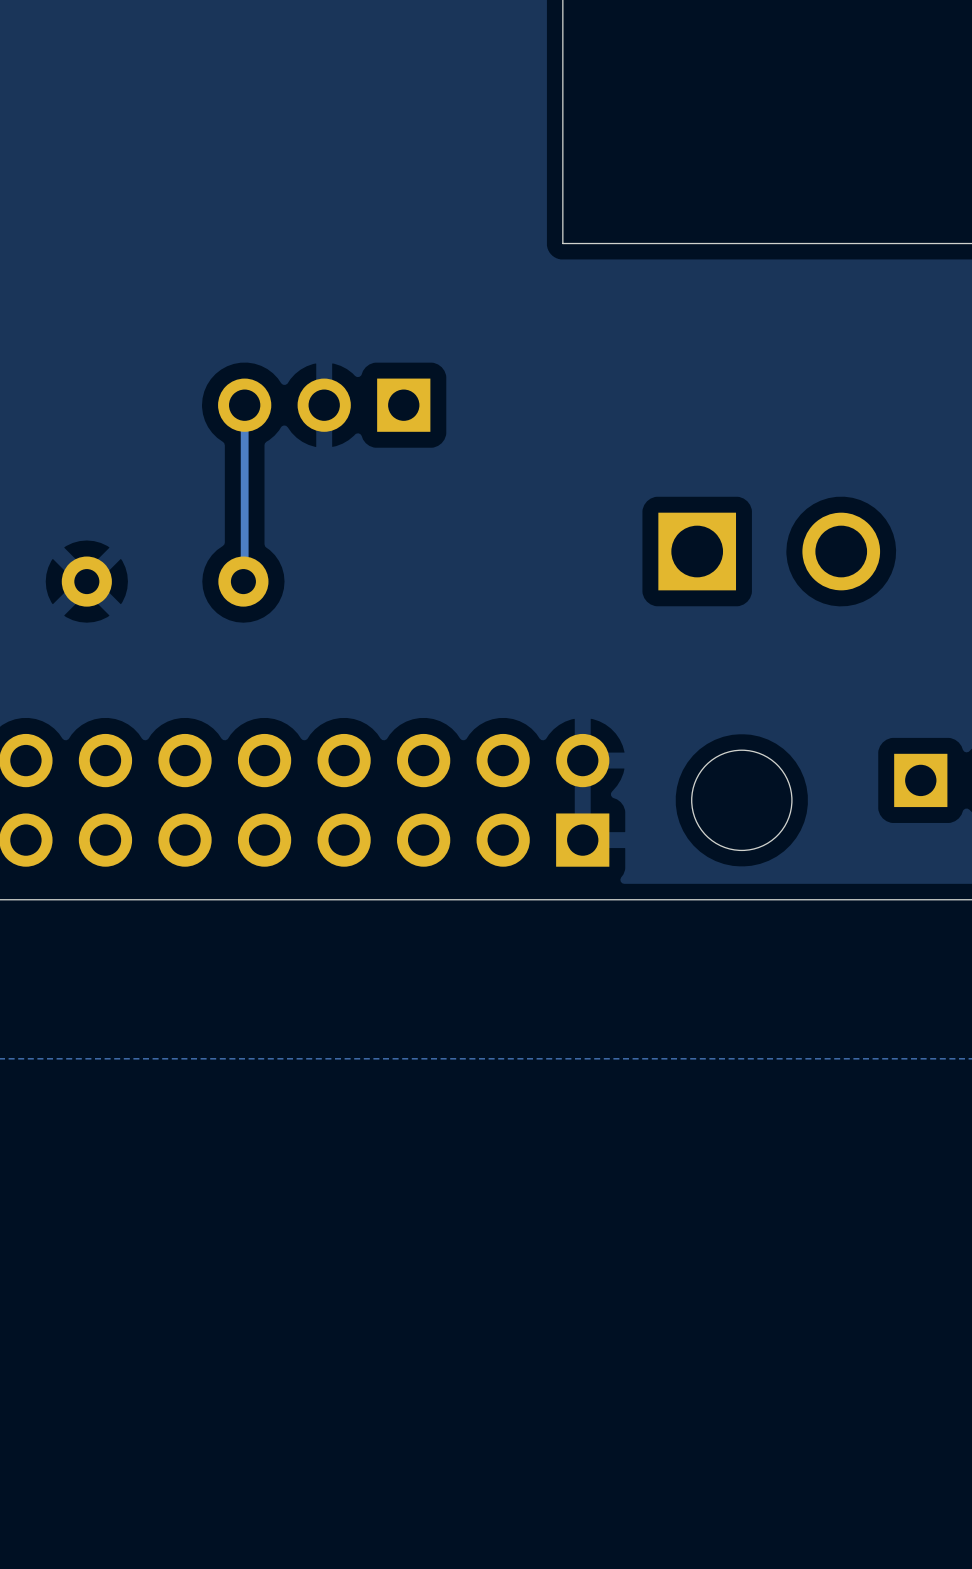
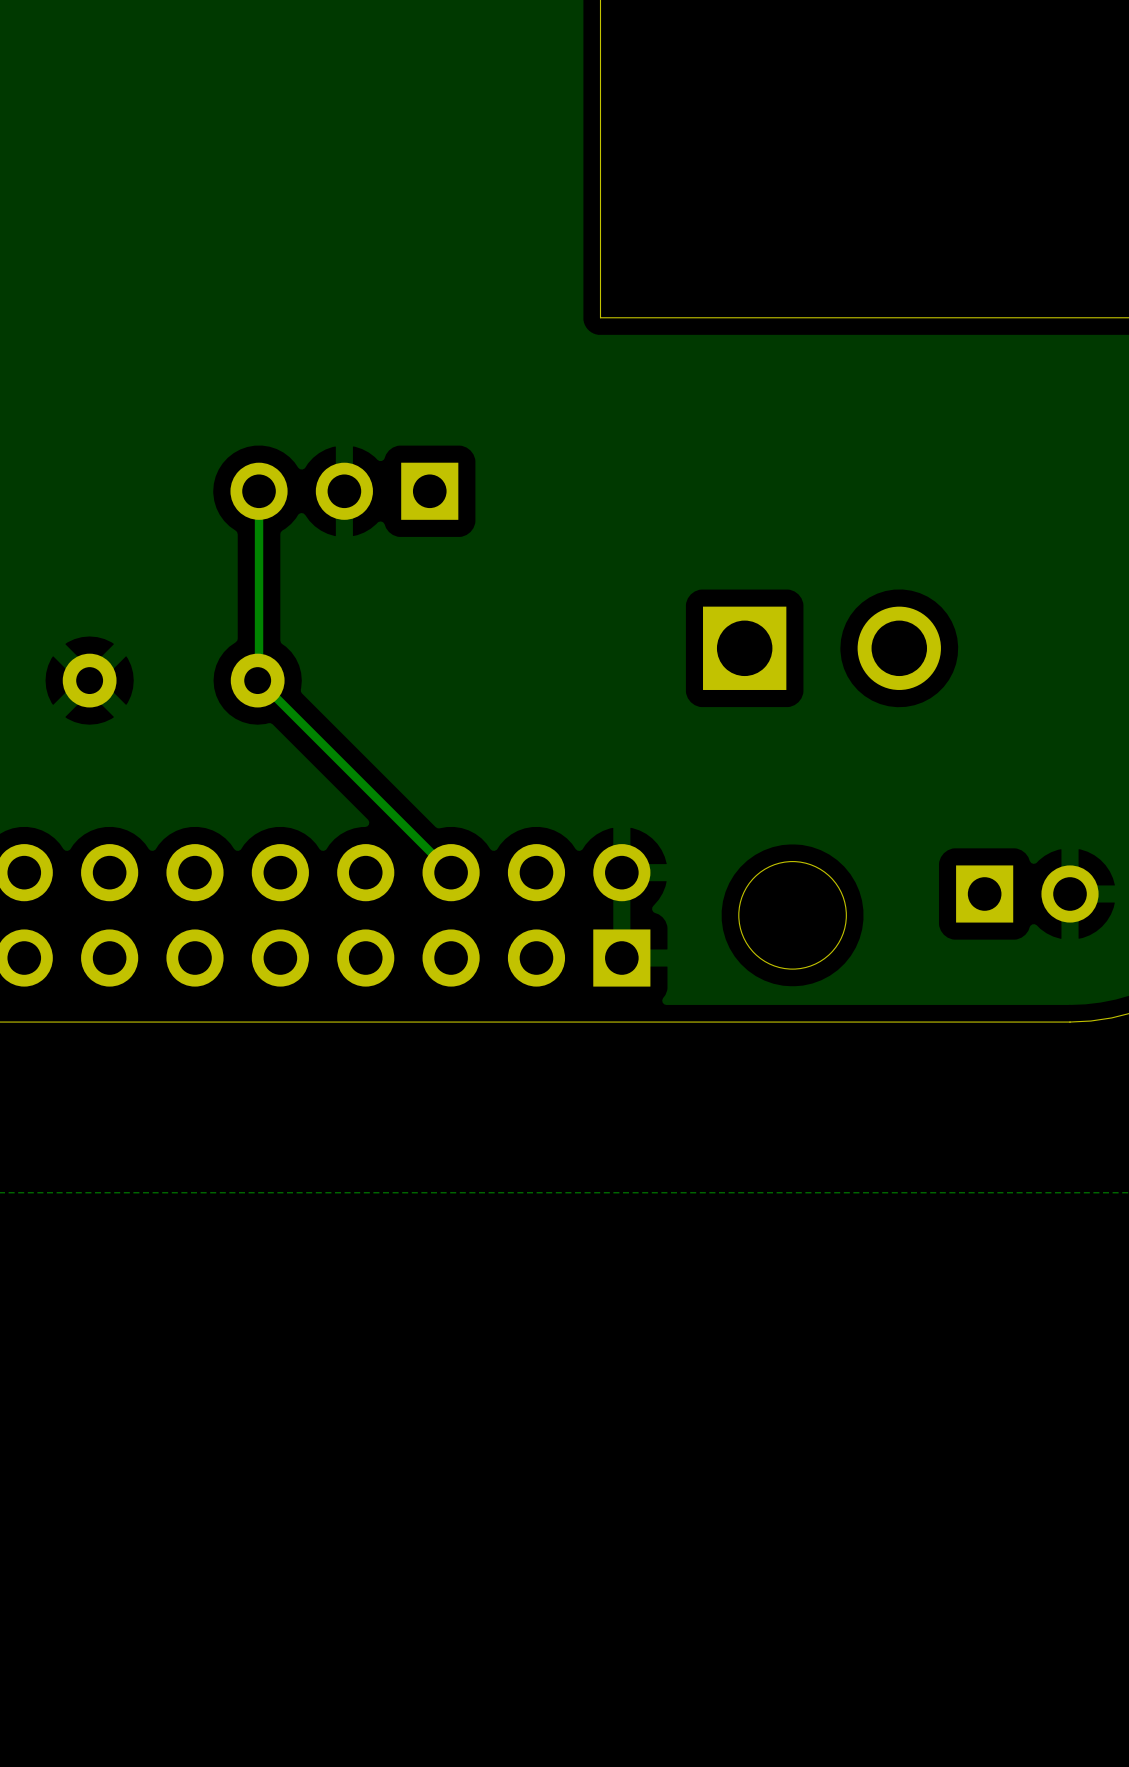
track: none -> (259, 680) (451, 872)

